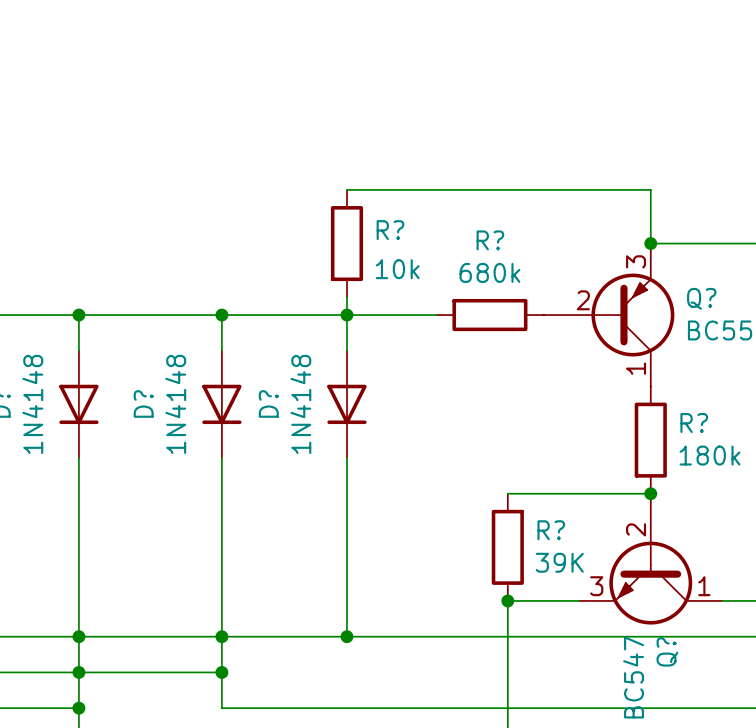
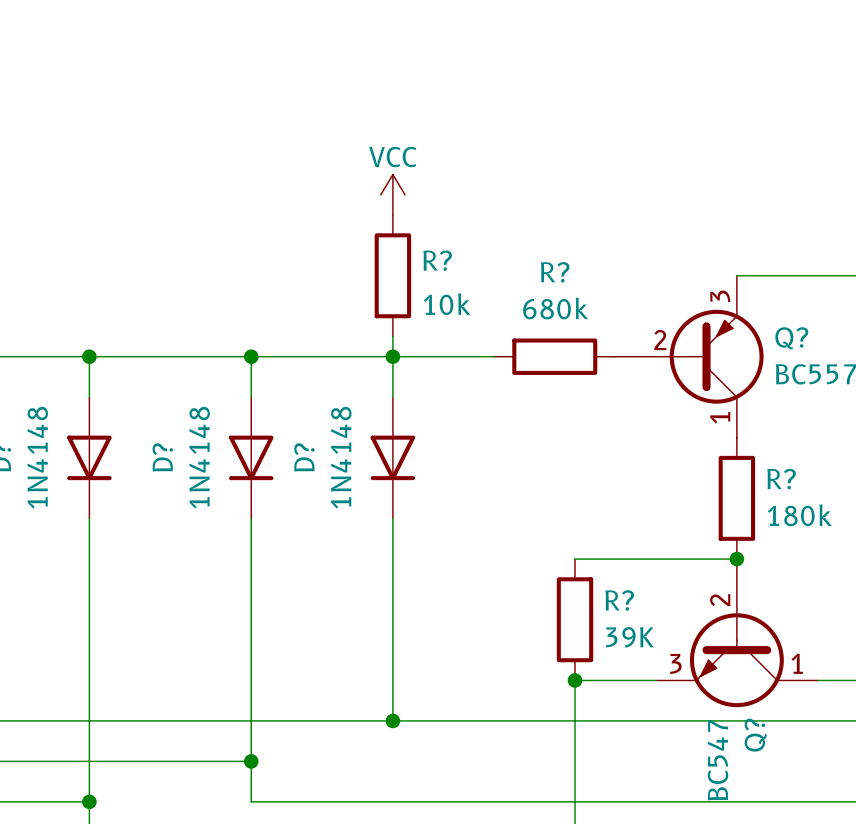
power symbol: none -> VCC (392, 194)
wire: (346, 189) (650, 189) (650, 243) -> none
junction: (650, 243) -> none
junction: (78, 636) -> none
junction: (221, 636) -> none
junction: (78, 672) -> none

